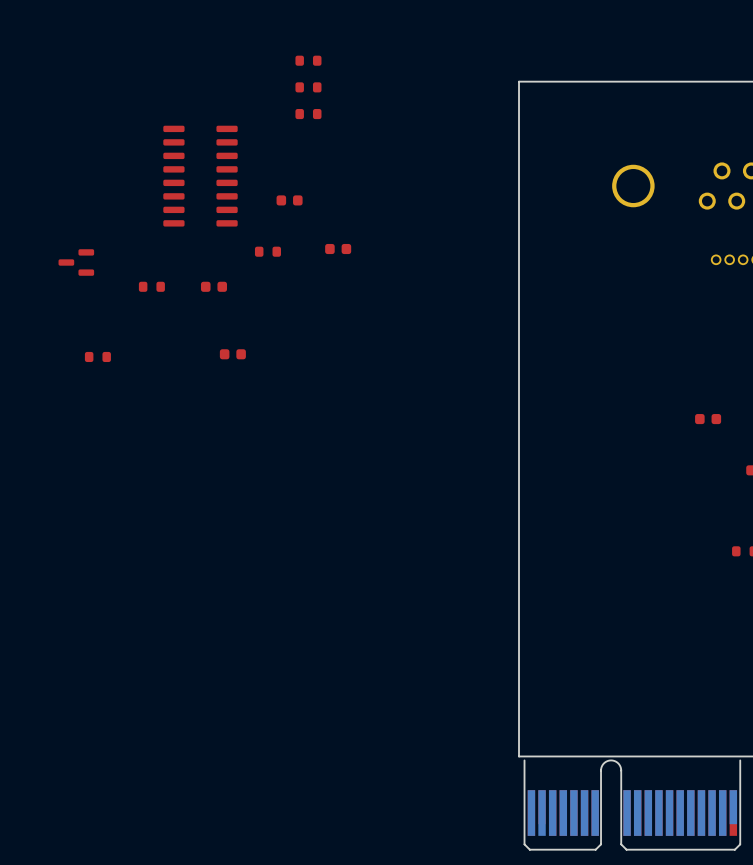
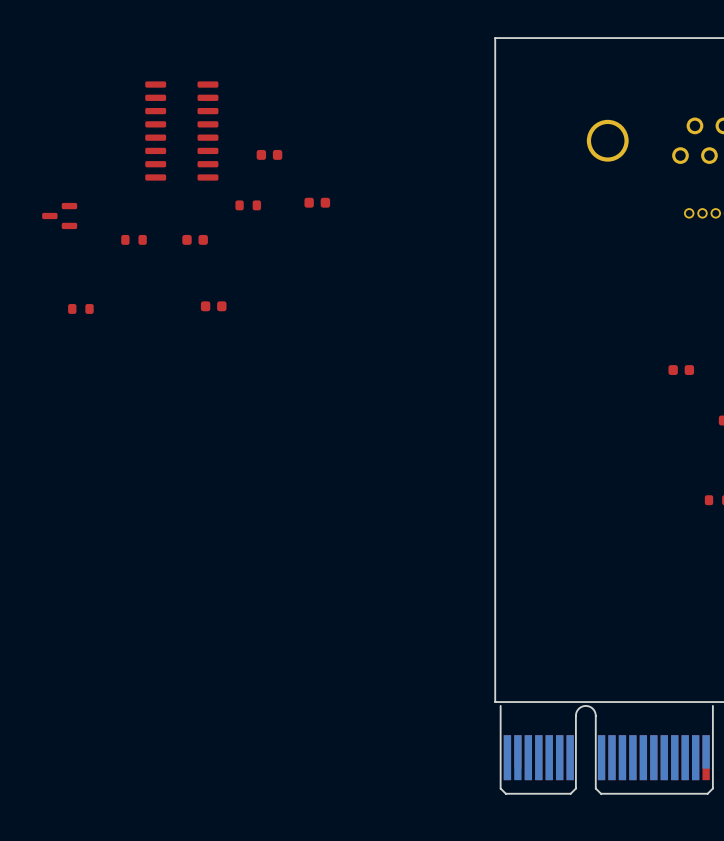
part: (308, 60) -> none
part: (308, 87) -> none
part: (308, 114) -> none

